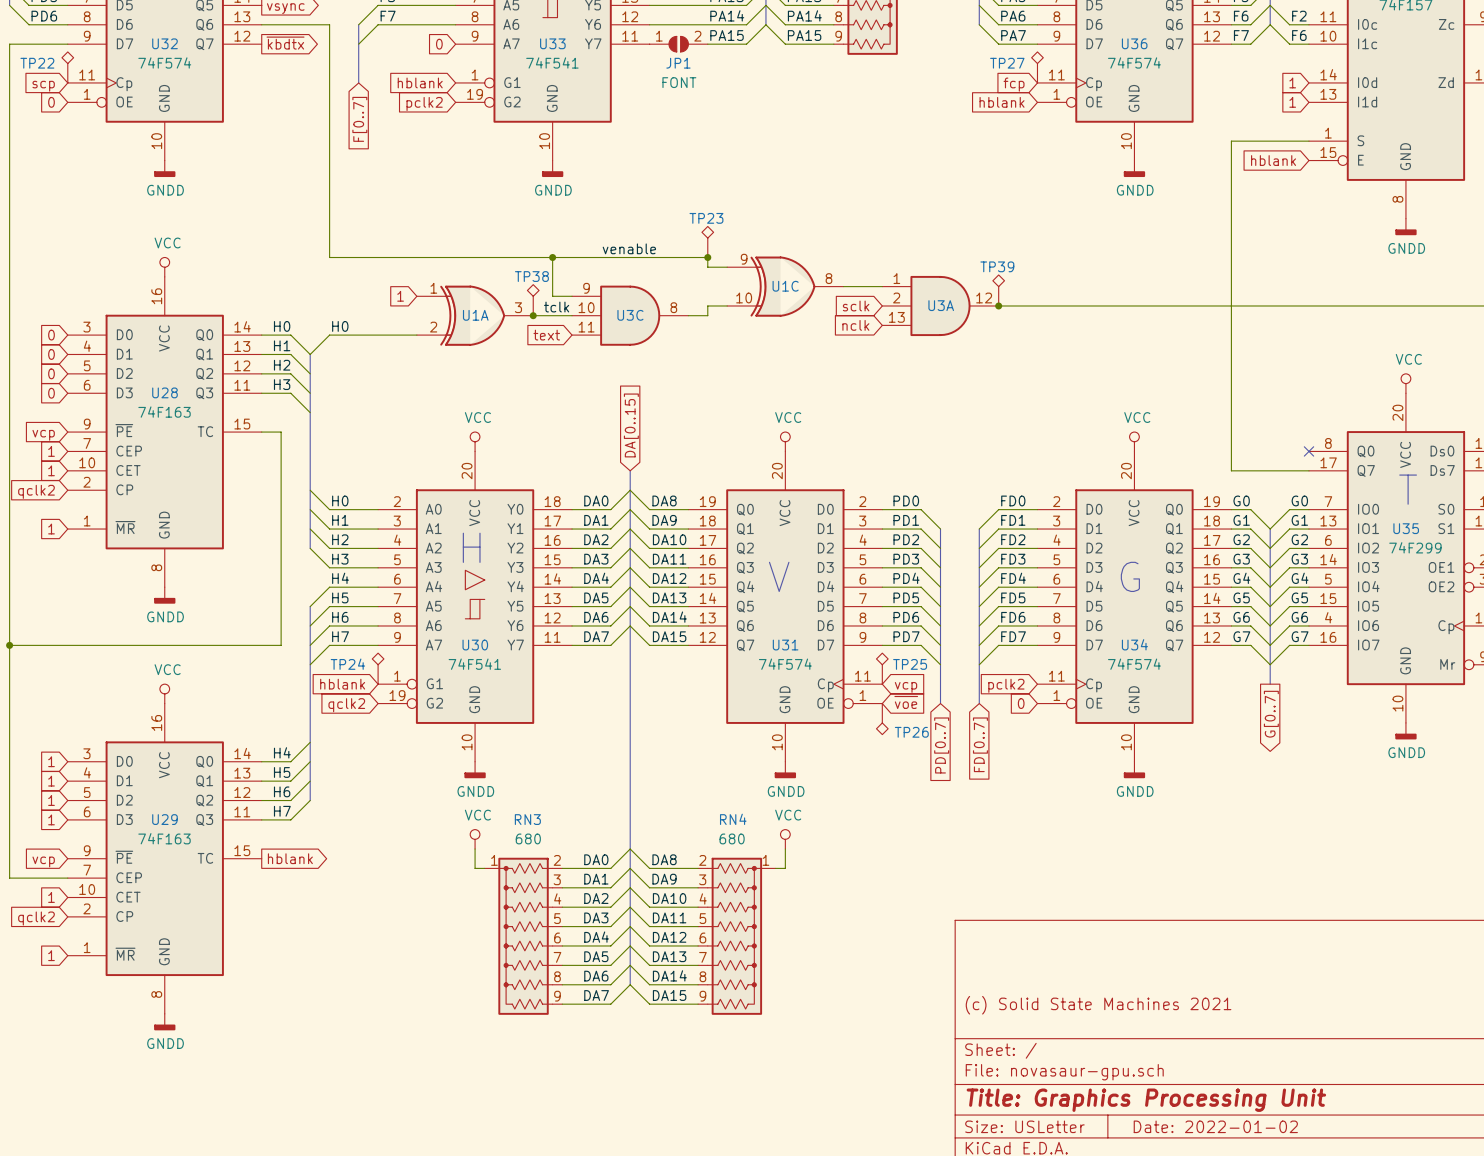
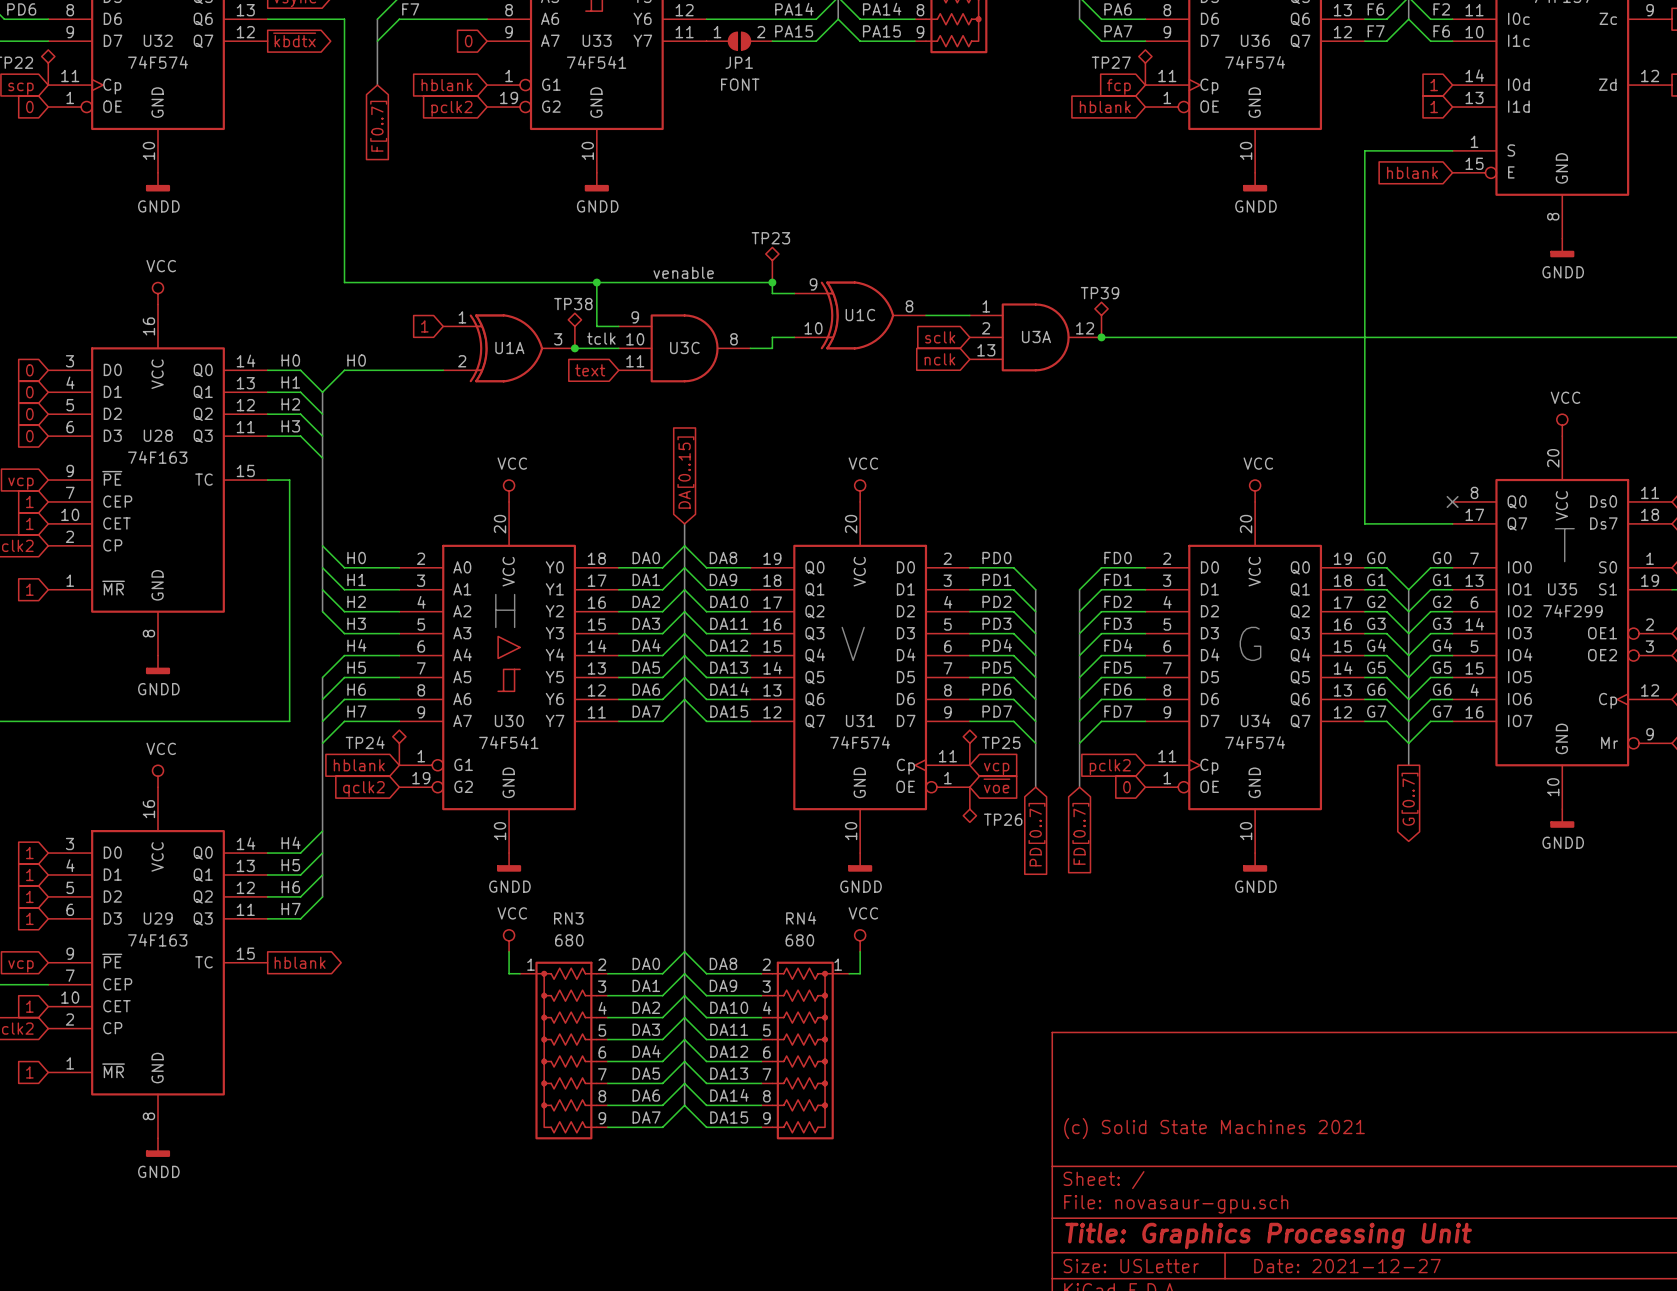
title block: Date: 2022-01-02 (1215, 1126) -> Date: 2021-12-27 (1347, 1266)

